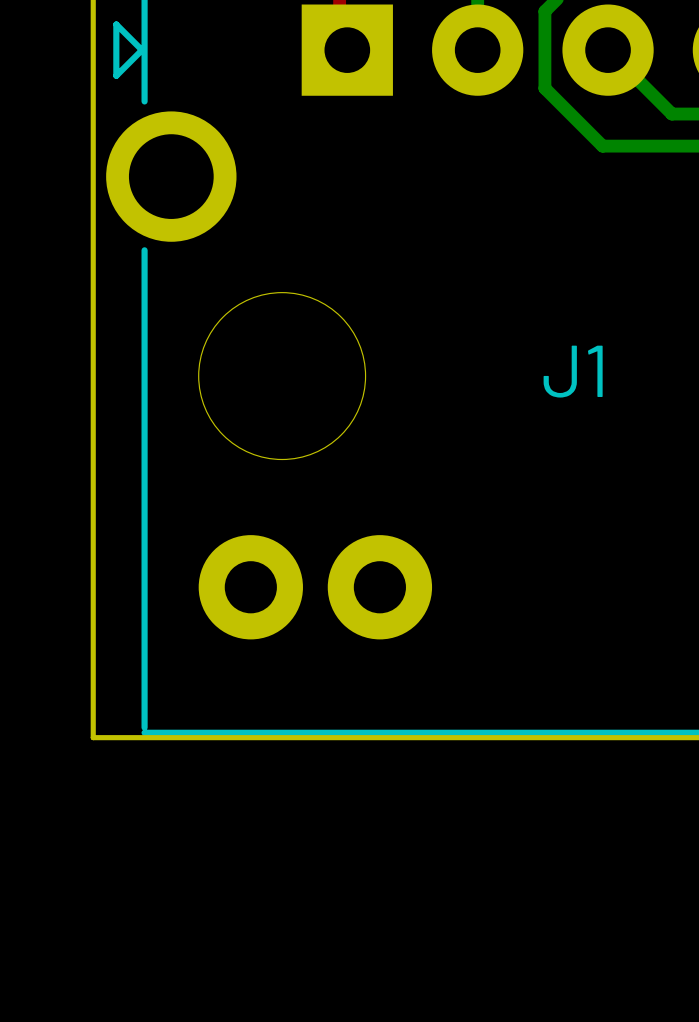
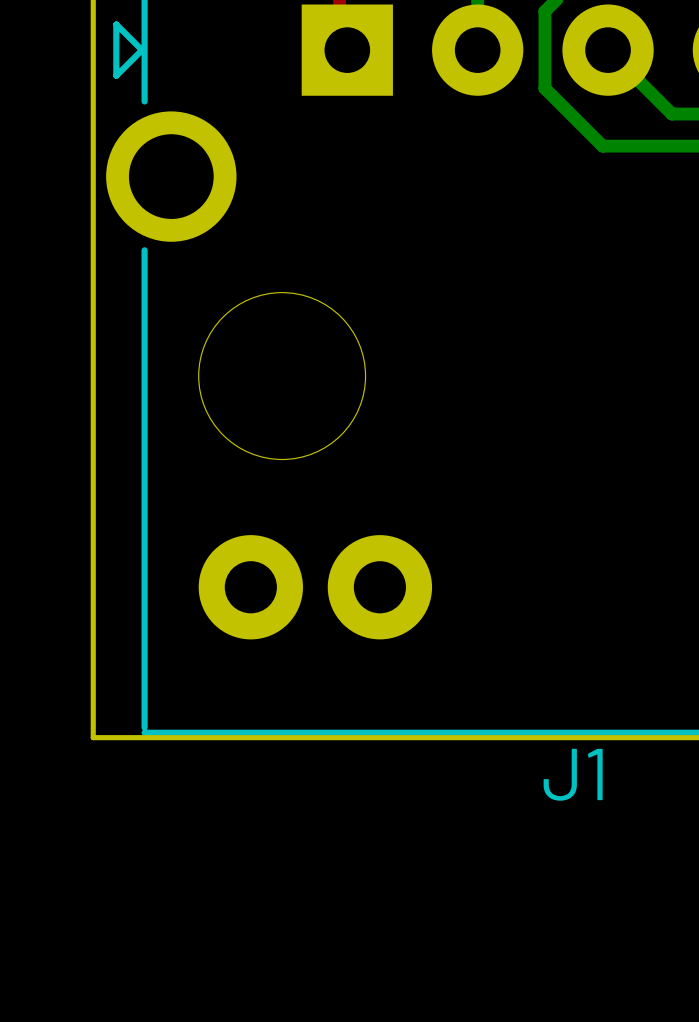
J1 name position: J1 (573, 371) -> J1 (573, 774)

